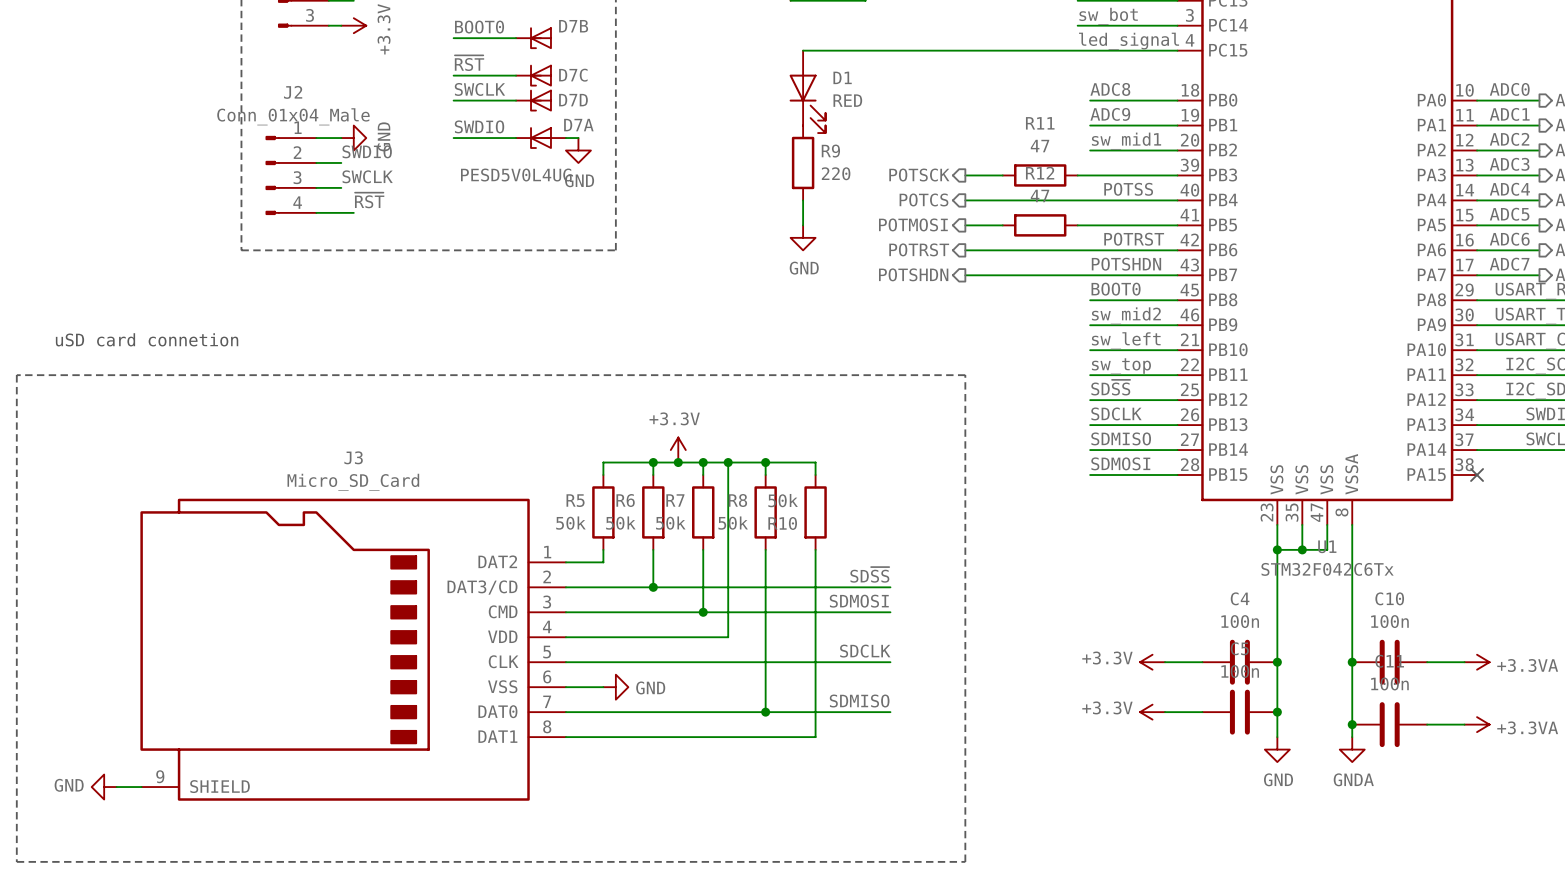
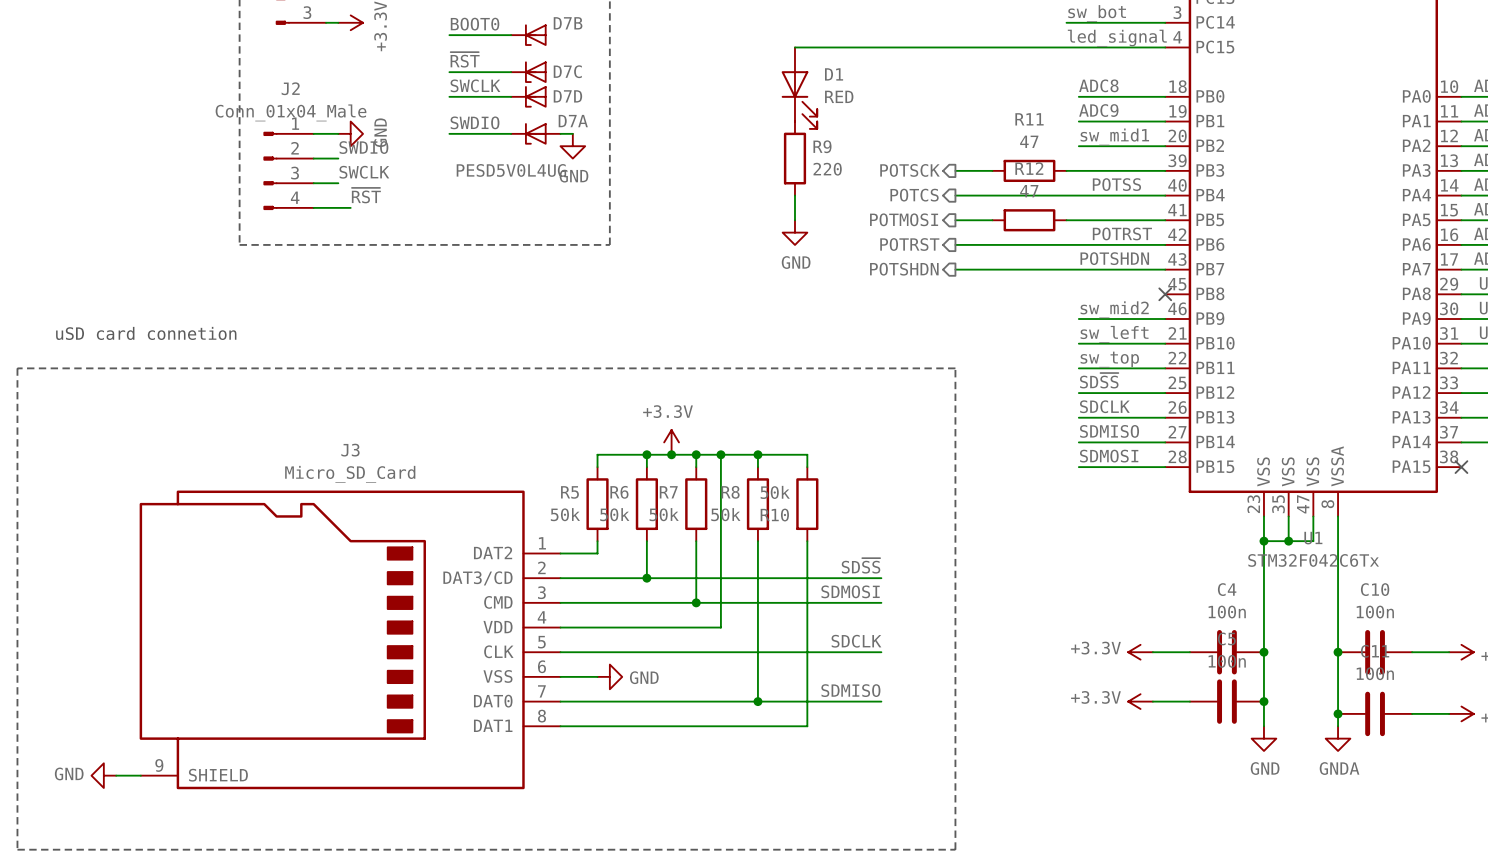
label: BOOT0 (1116, 289) -> none
wire: (1090, 300) (1177, 300) -> none
no-connect mark: none -> (1165, 294)

